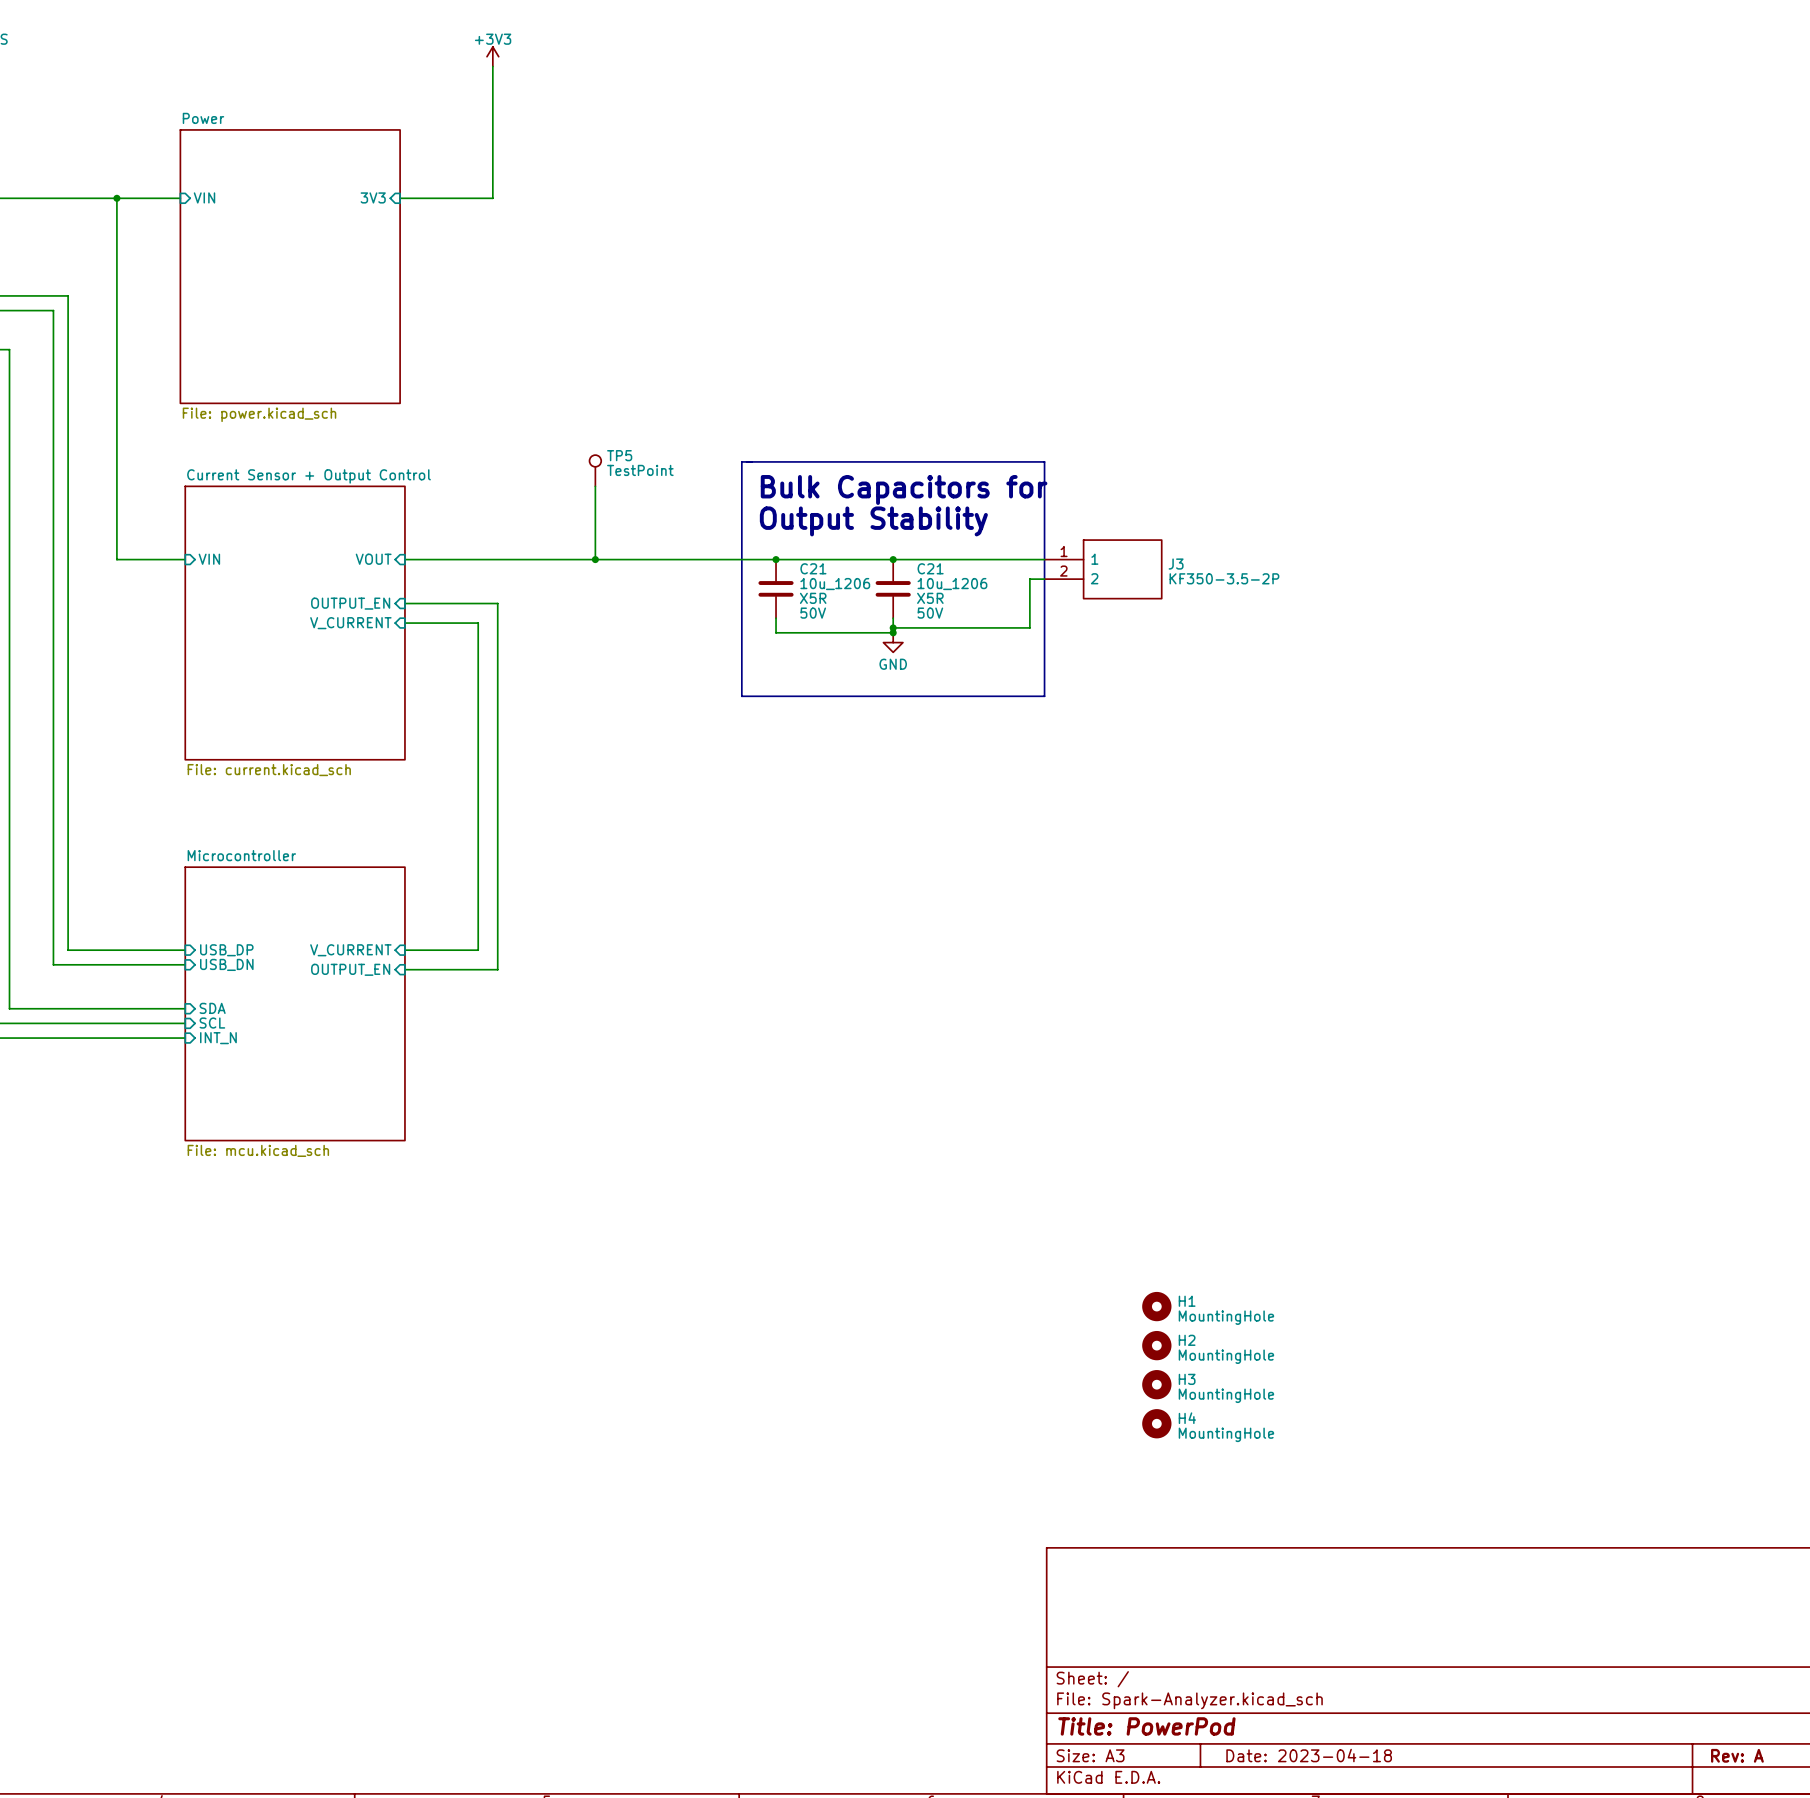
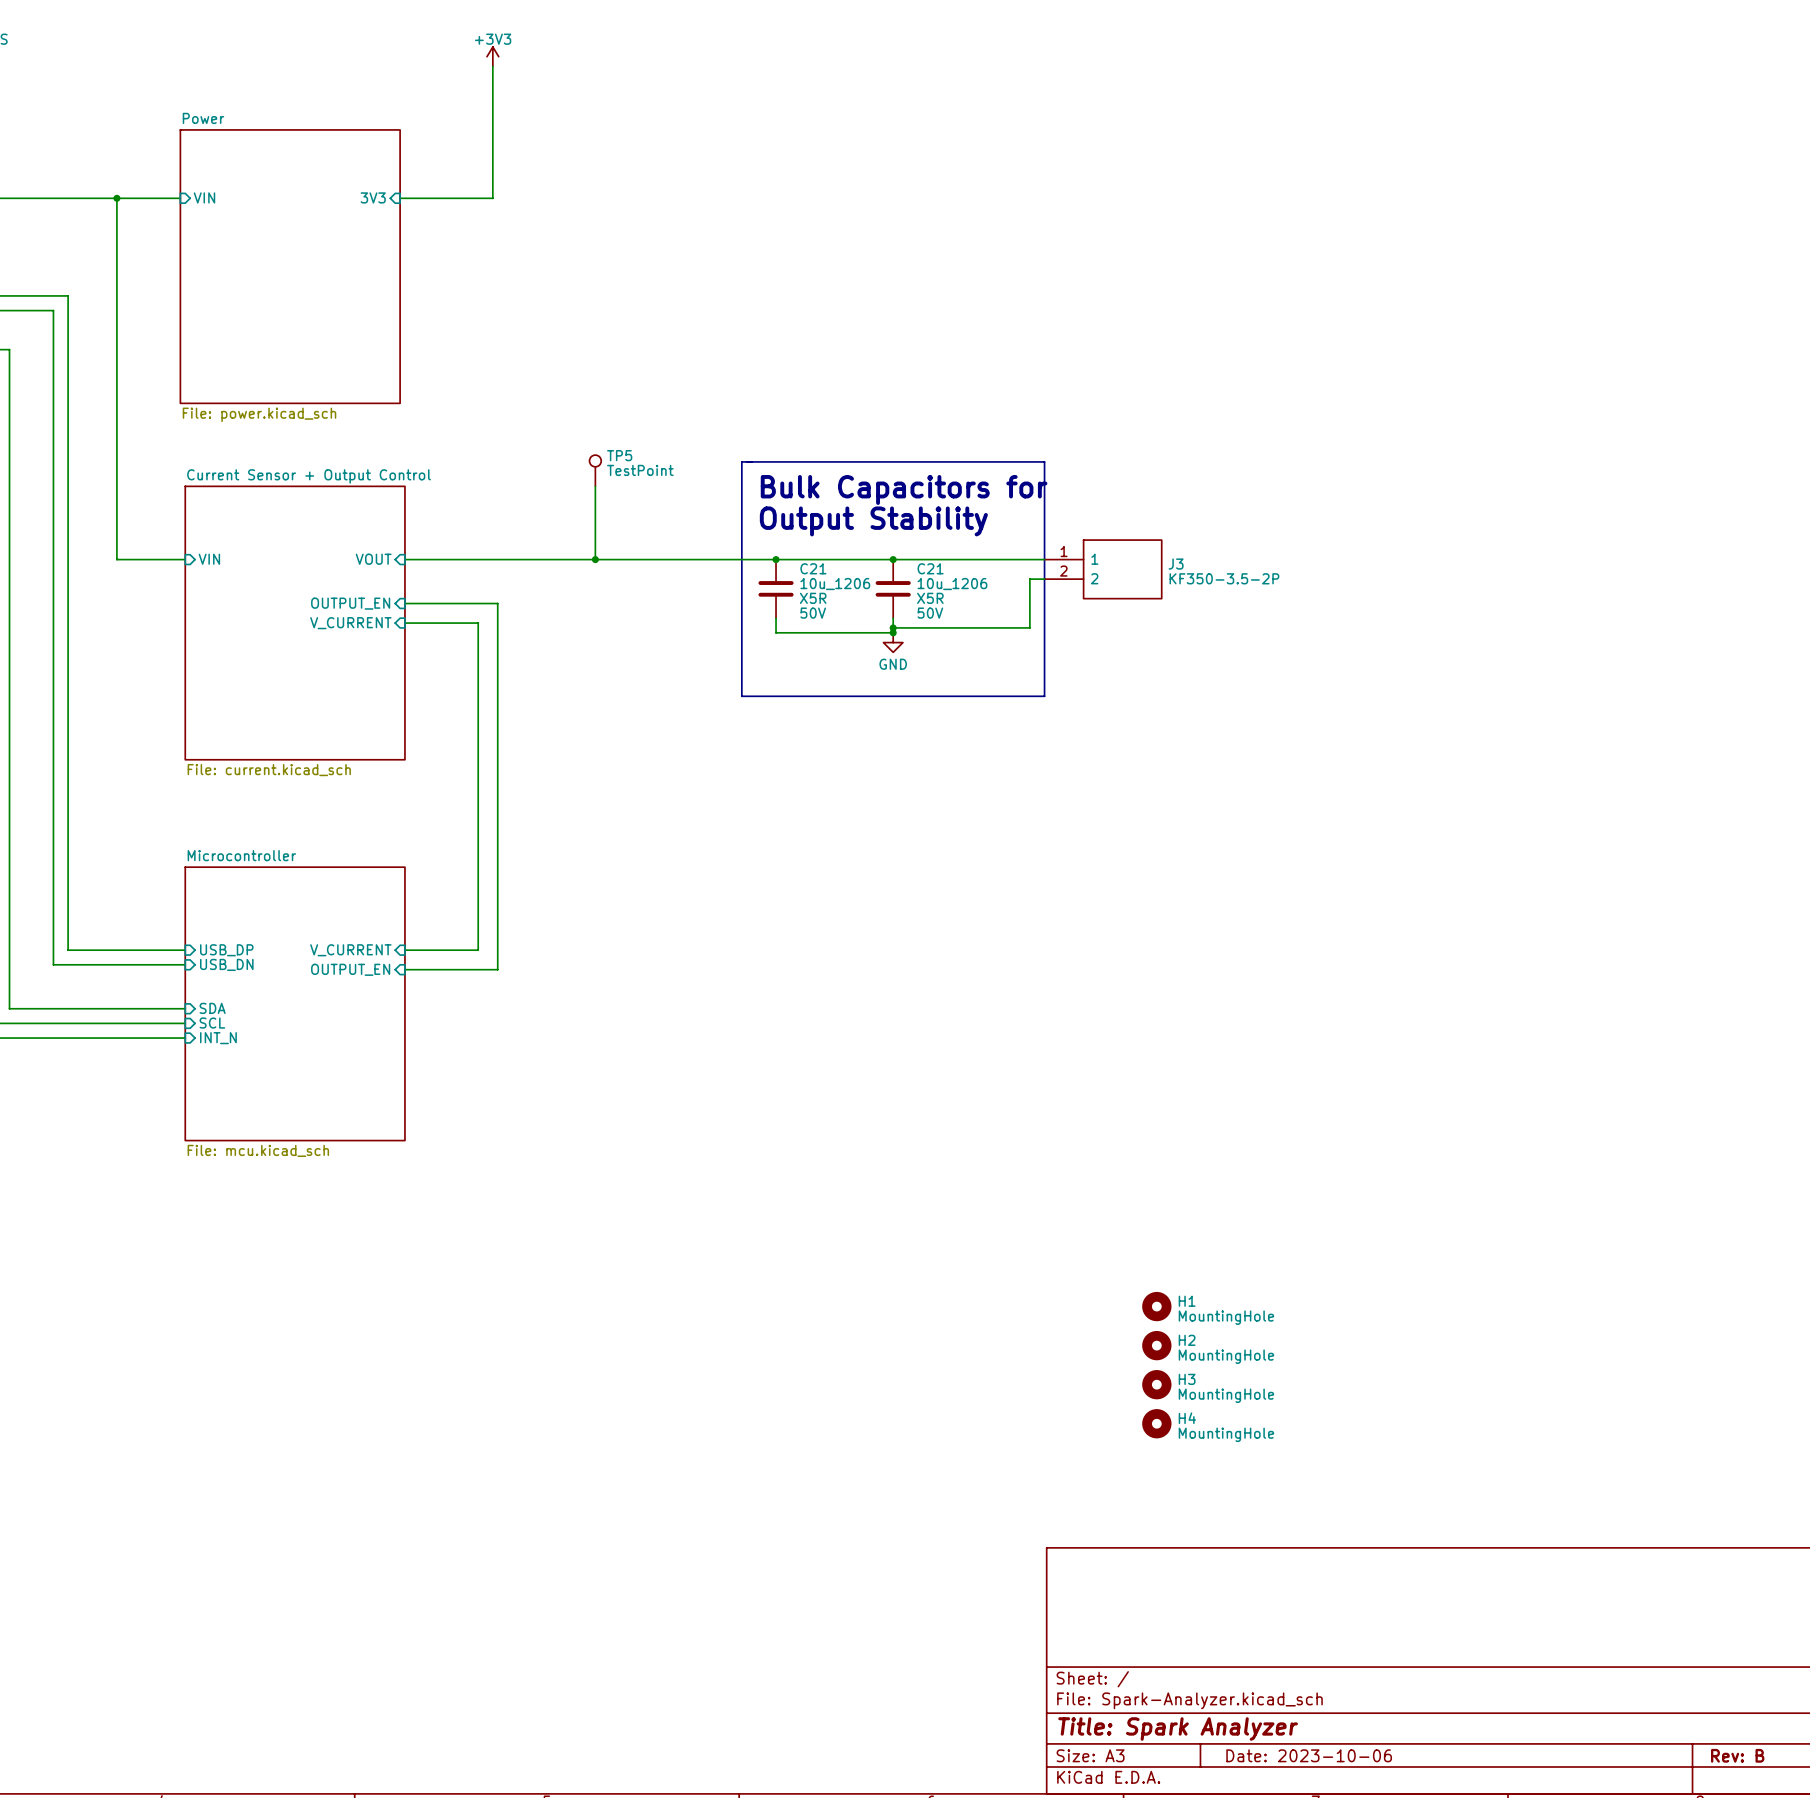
title block: Title: PowerPod (1146, 1726) -> Title: Spark Analyzer (1178, 1729)
title block: Date: 2023-04-18 (1309, 1755) -> Date: 2023-10-06 (1309, 1755)
title block: Rev: A (1737, 1755) -> Rev: B (1737, 1755)

